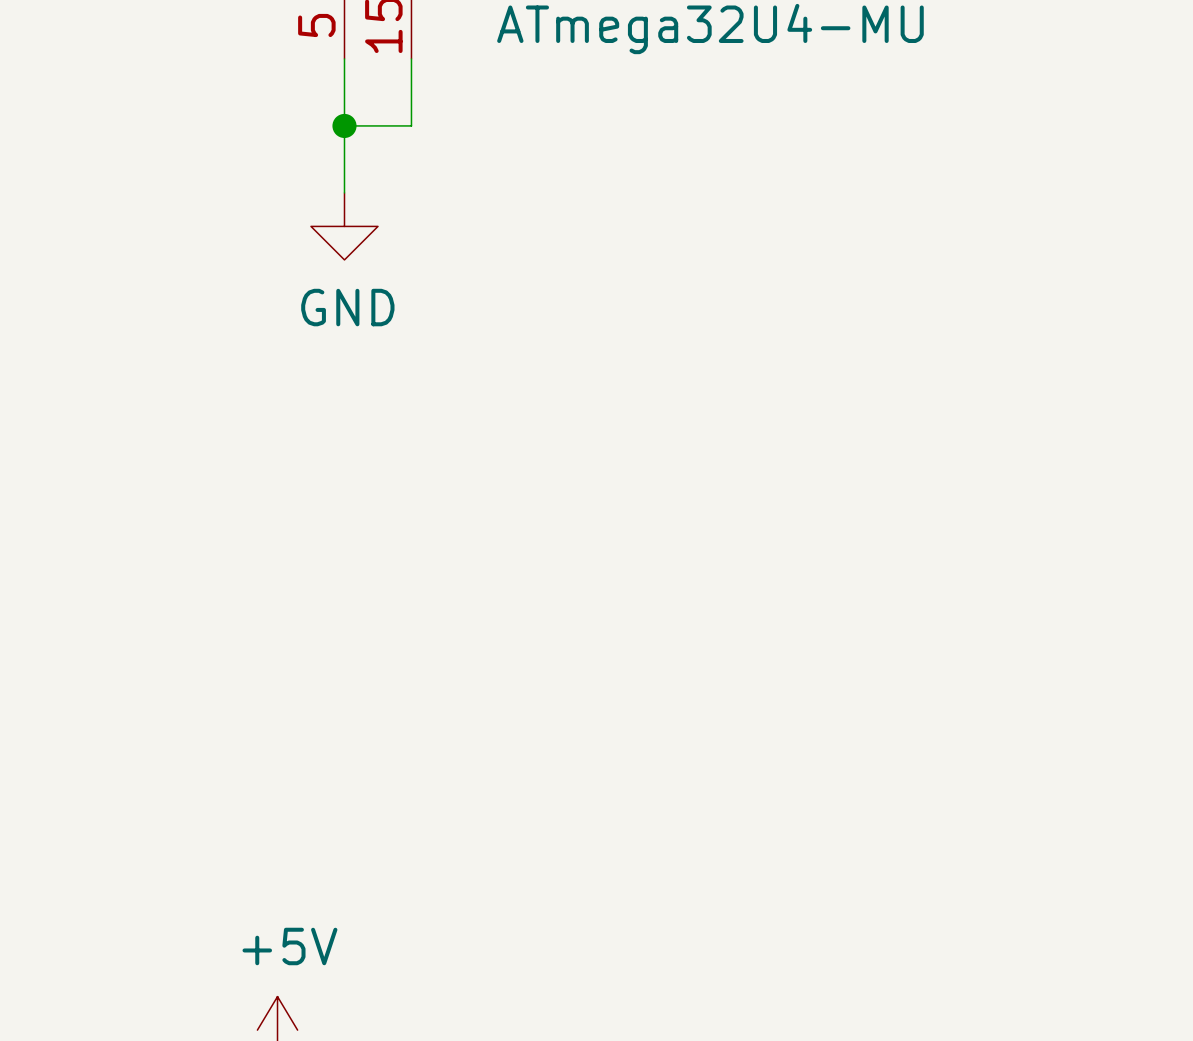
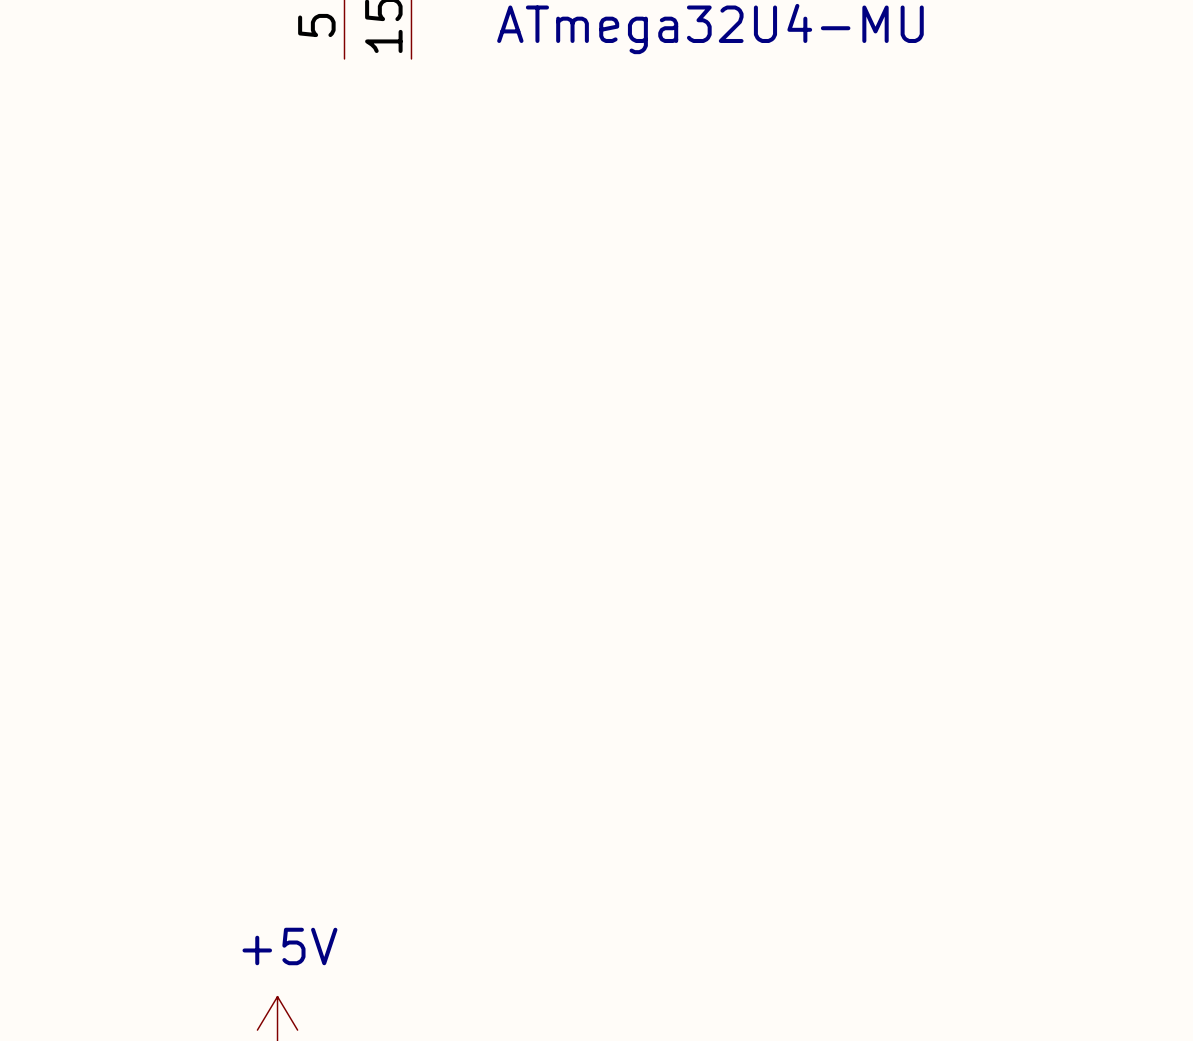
wire: (344, 58) (344, 192) -> none
wire: (411, 58) (411, 125) (344, 125) -> none
junction: (344, 125) -> none
power symbol: GND (344, 226) -> none

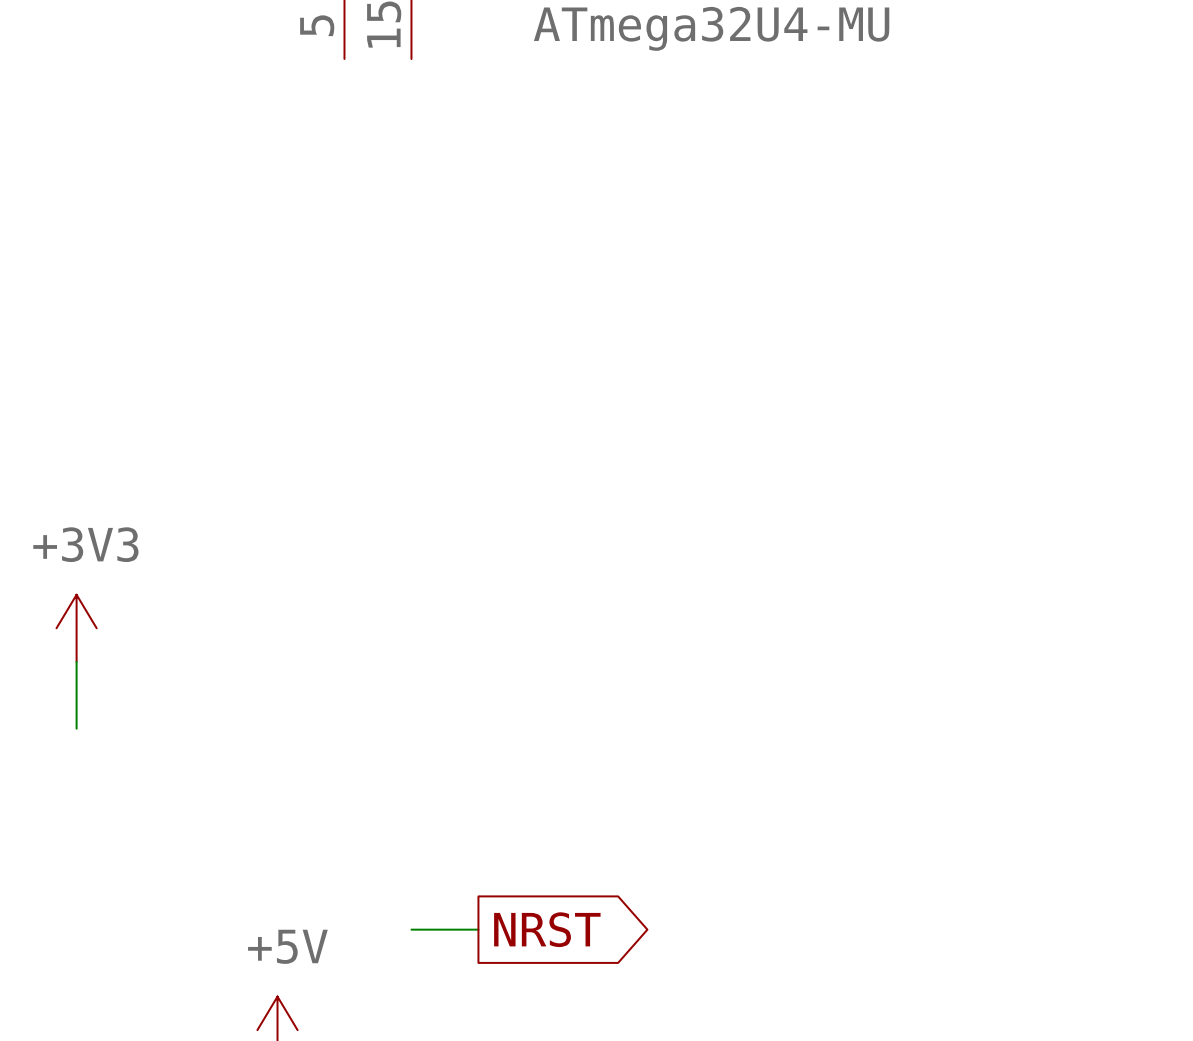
power symbol: none -> +3V3 (76, 628)
wire: none -> (76, 661) (76, 728)
wire: none -> (411, 929) (478, 929)
global label: none -> NRST (547, 929)

